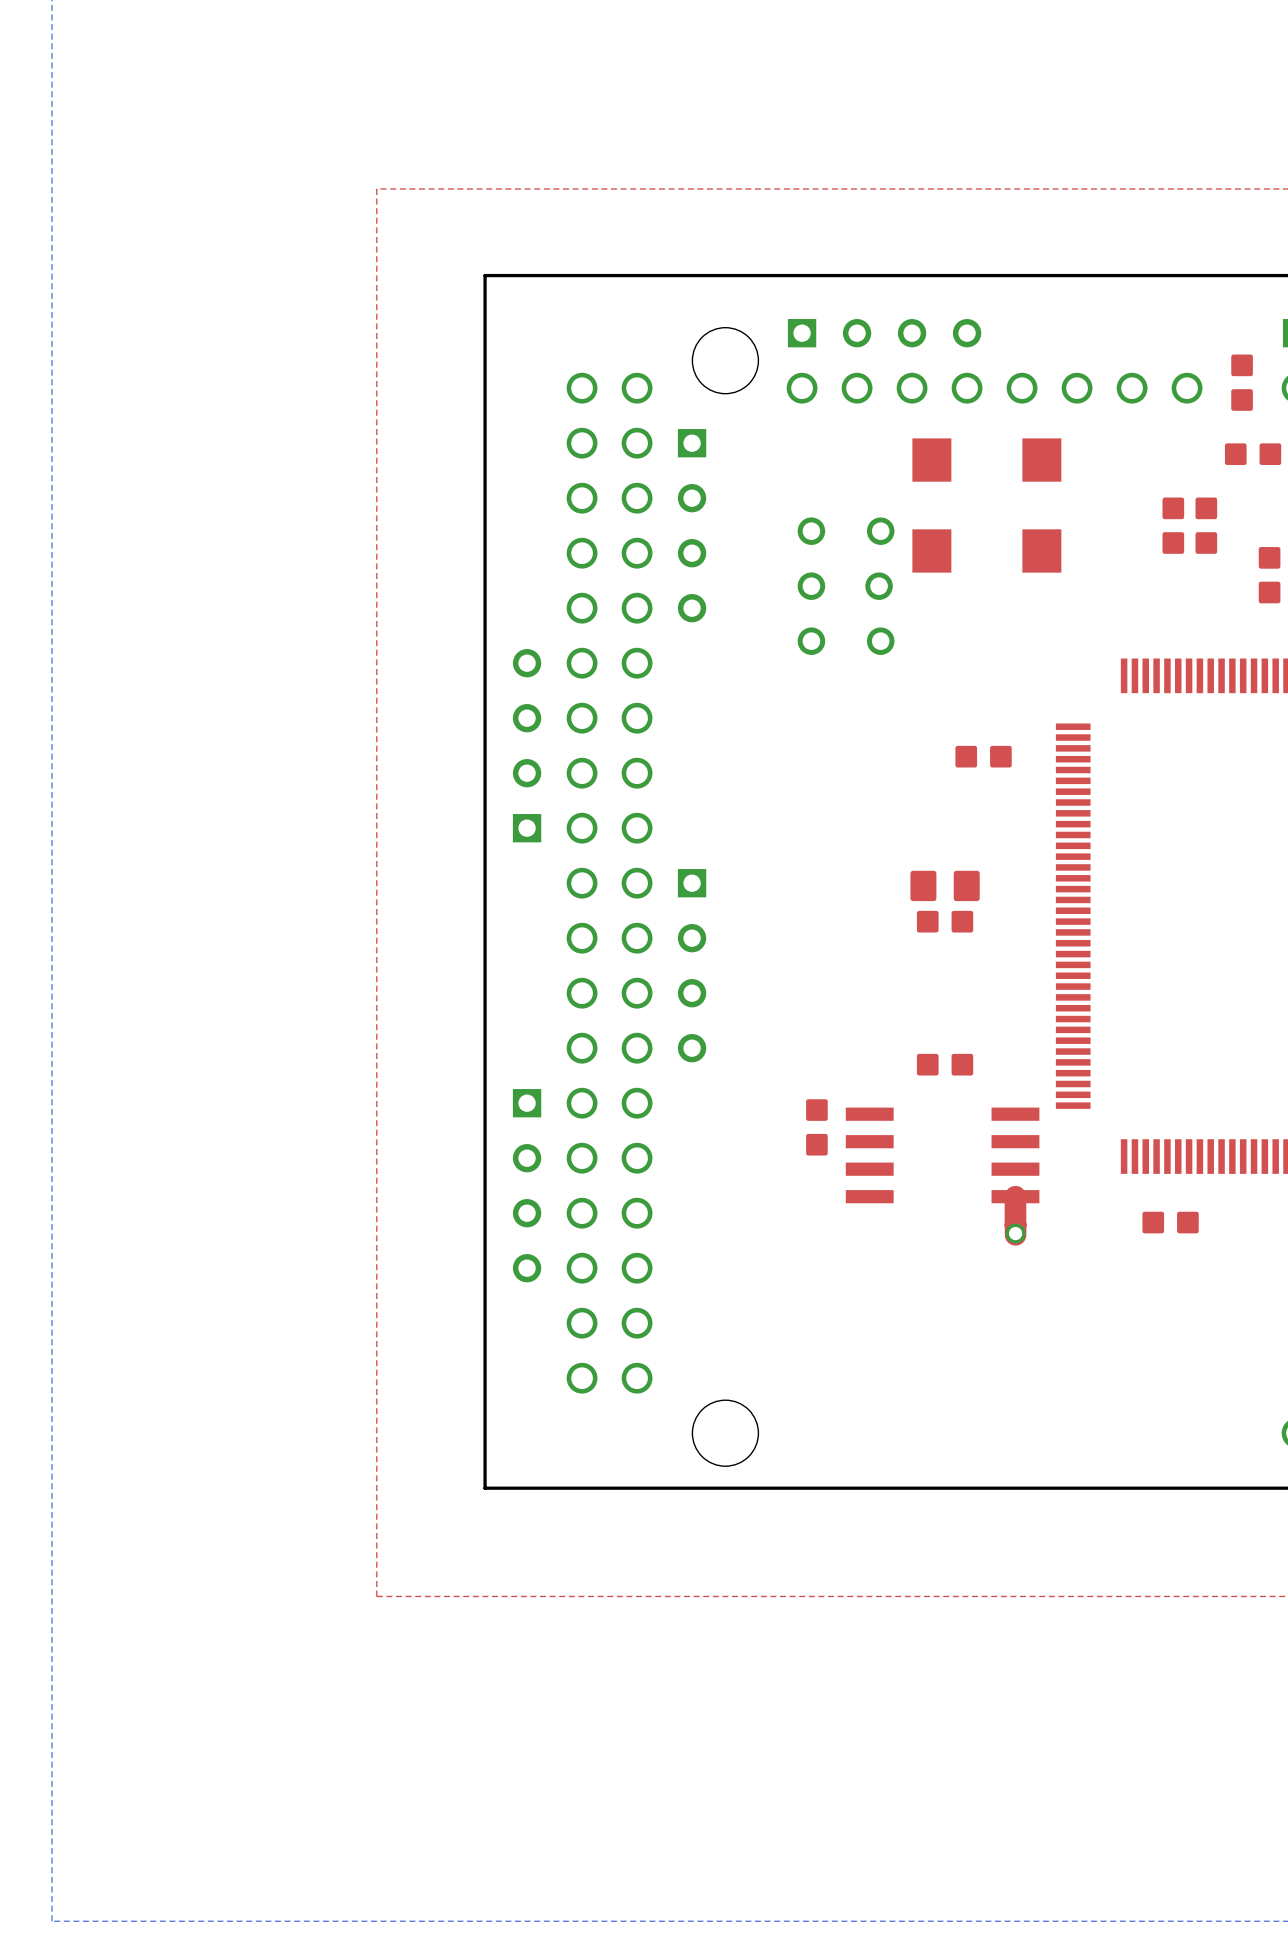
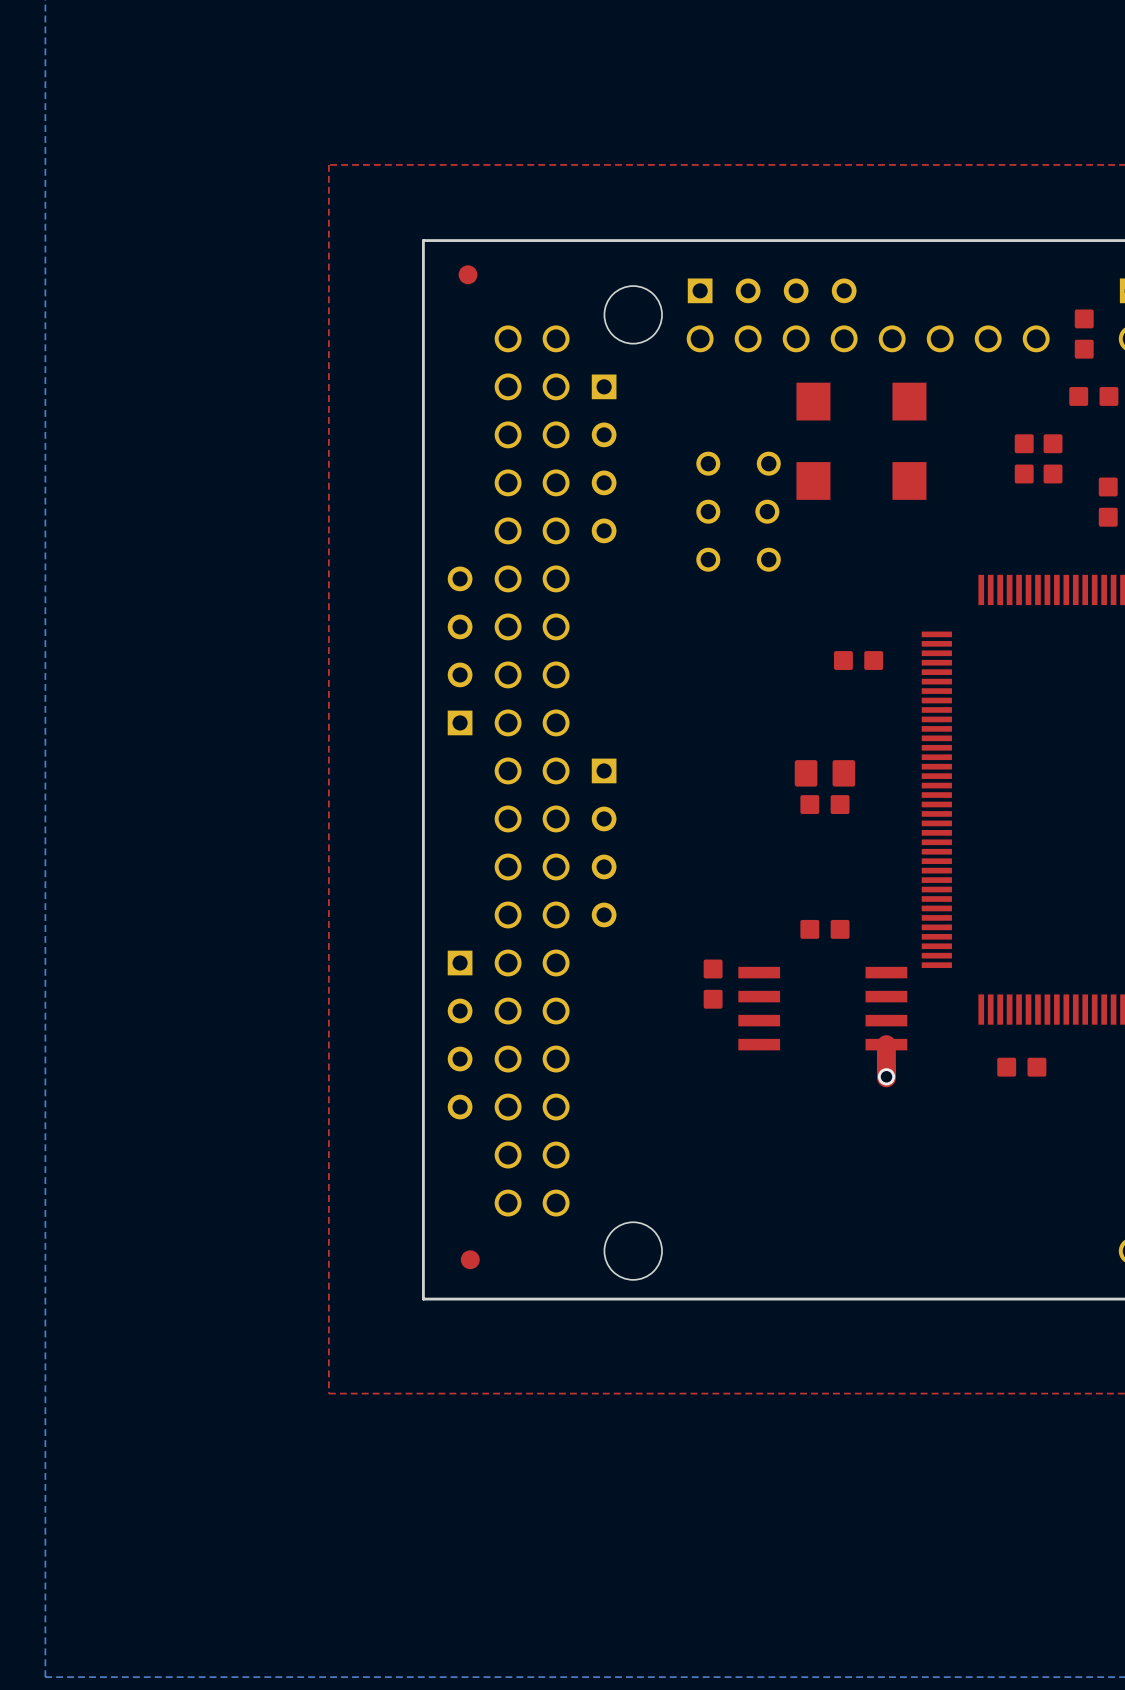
part: none -> (468, 274)
part: none -> (470, 1259)

